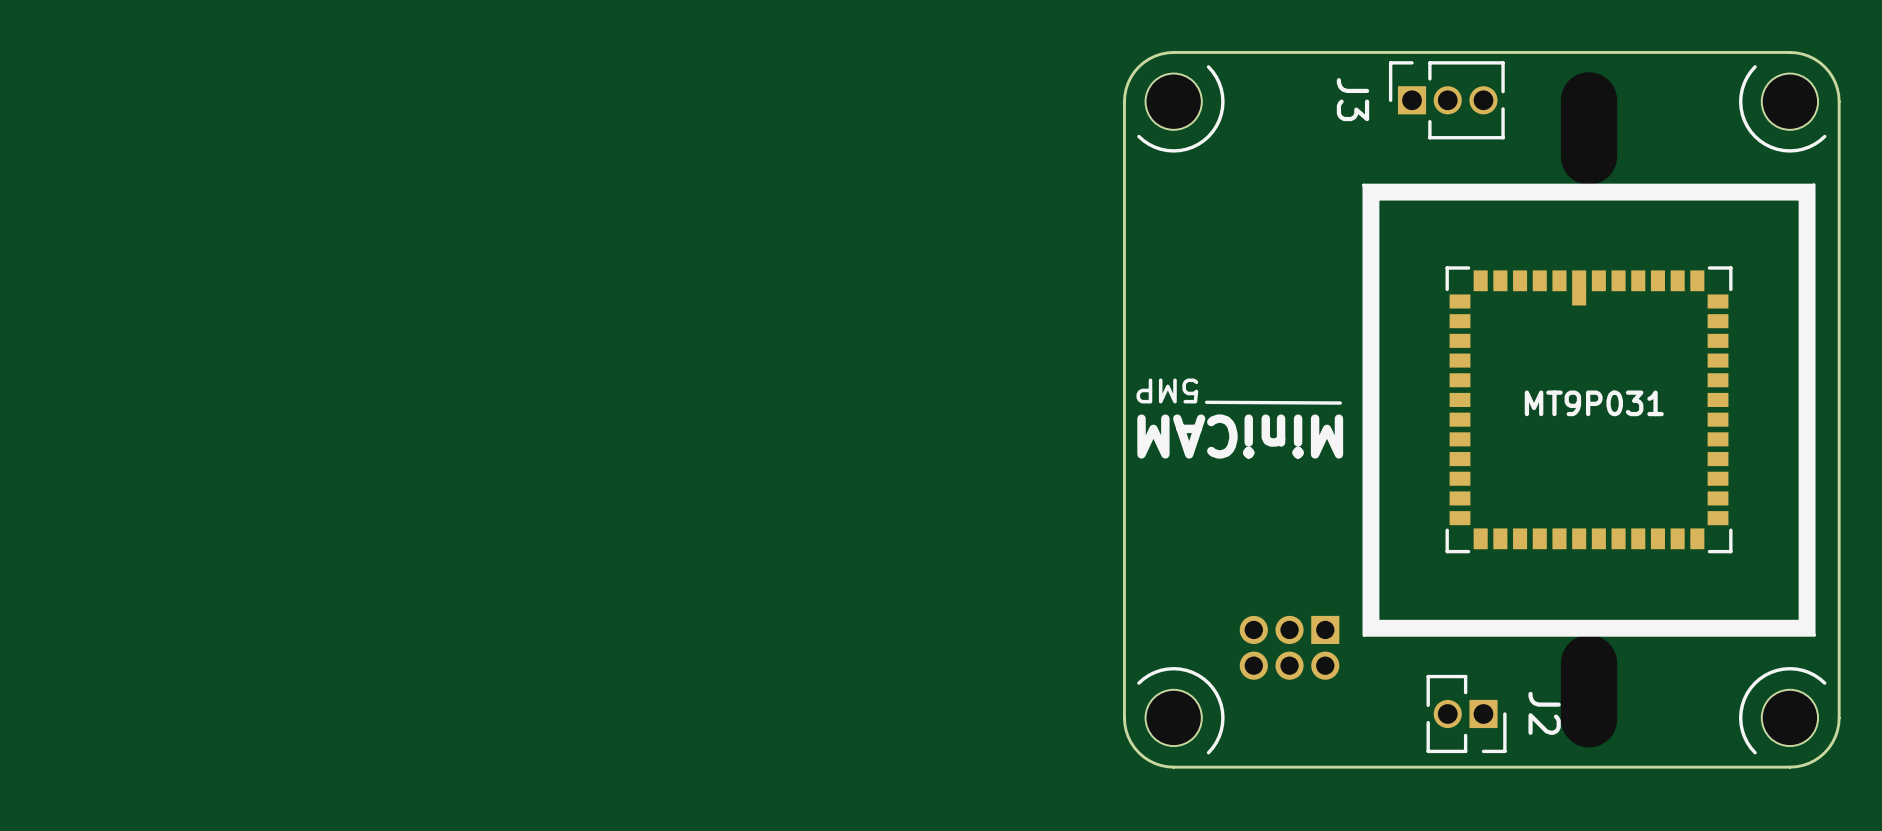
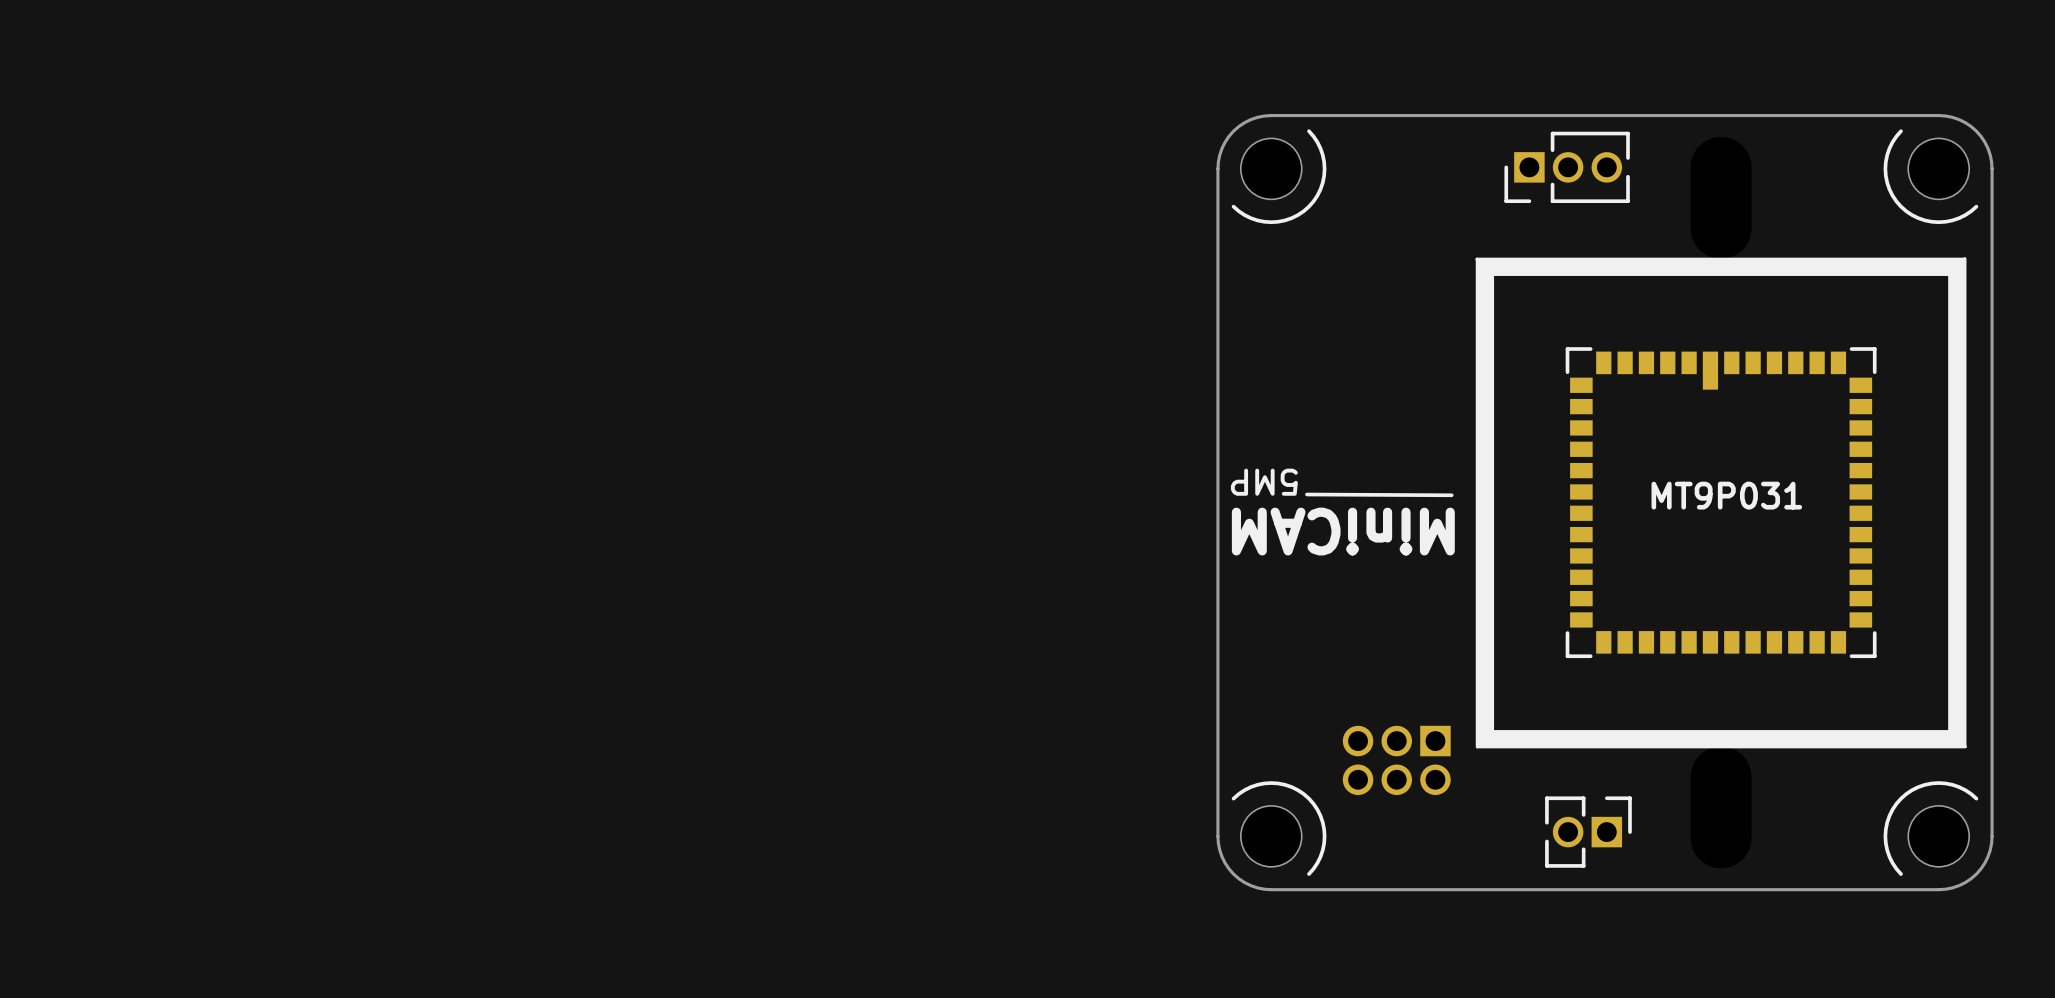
J3: (1446, 100) -> none
part: none -> (1567, 167)
J2: (1466, 713) -> none
part: none -> (1588, 832)

